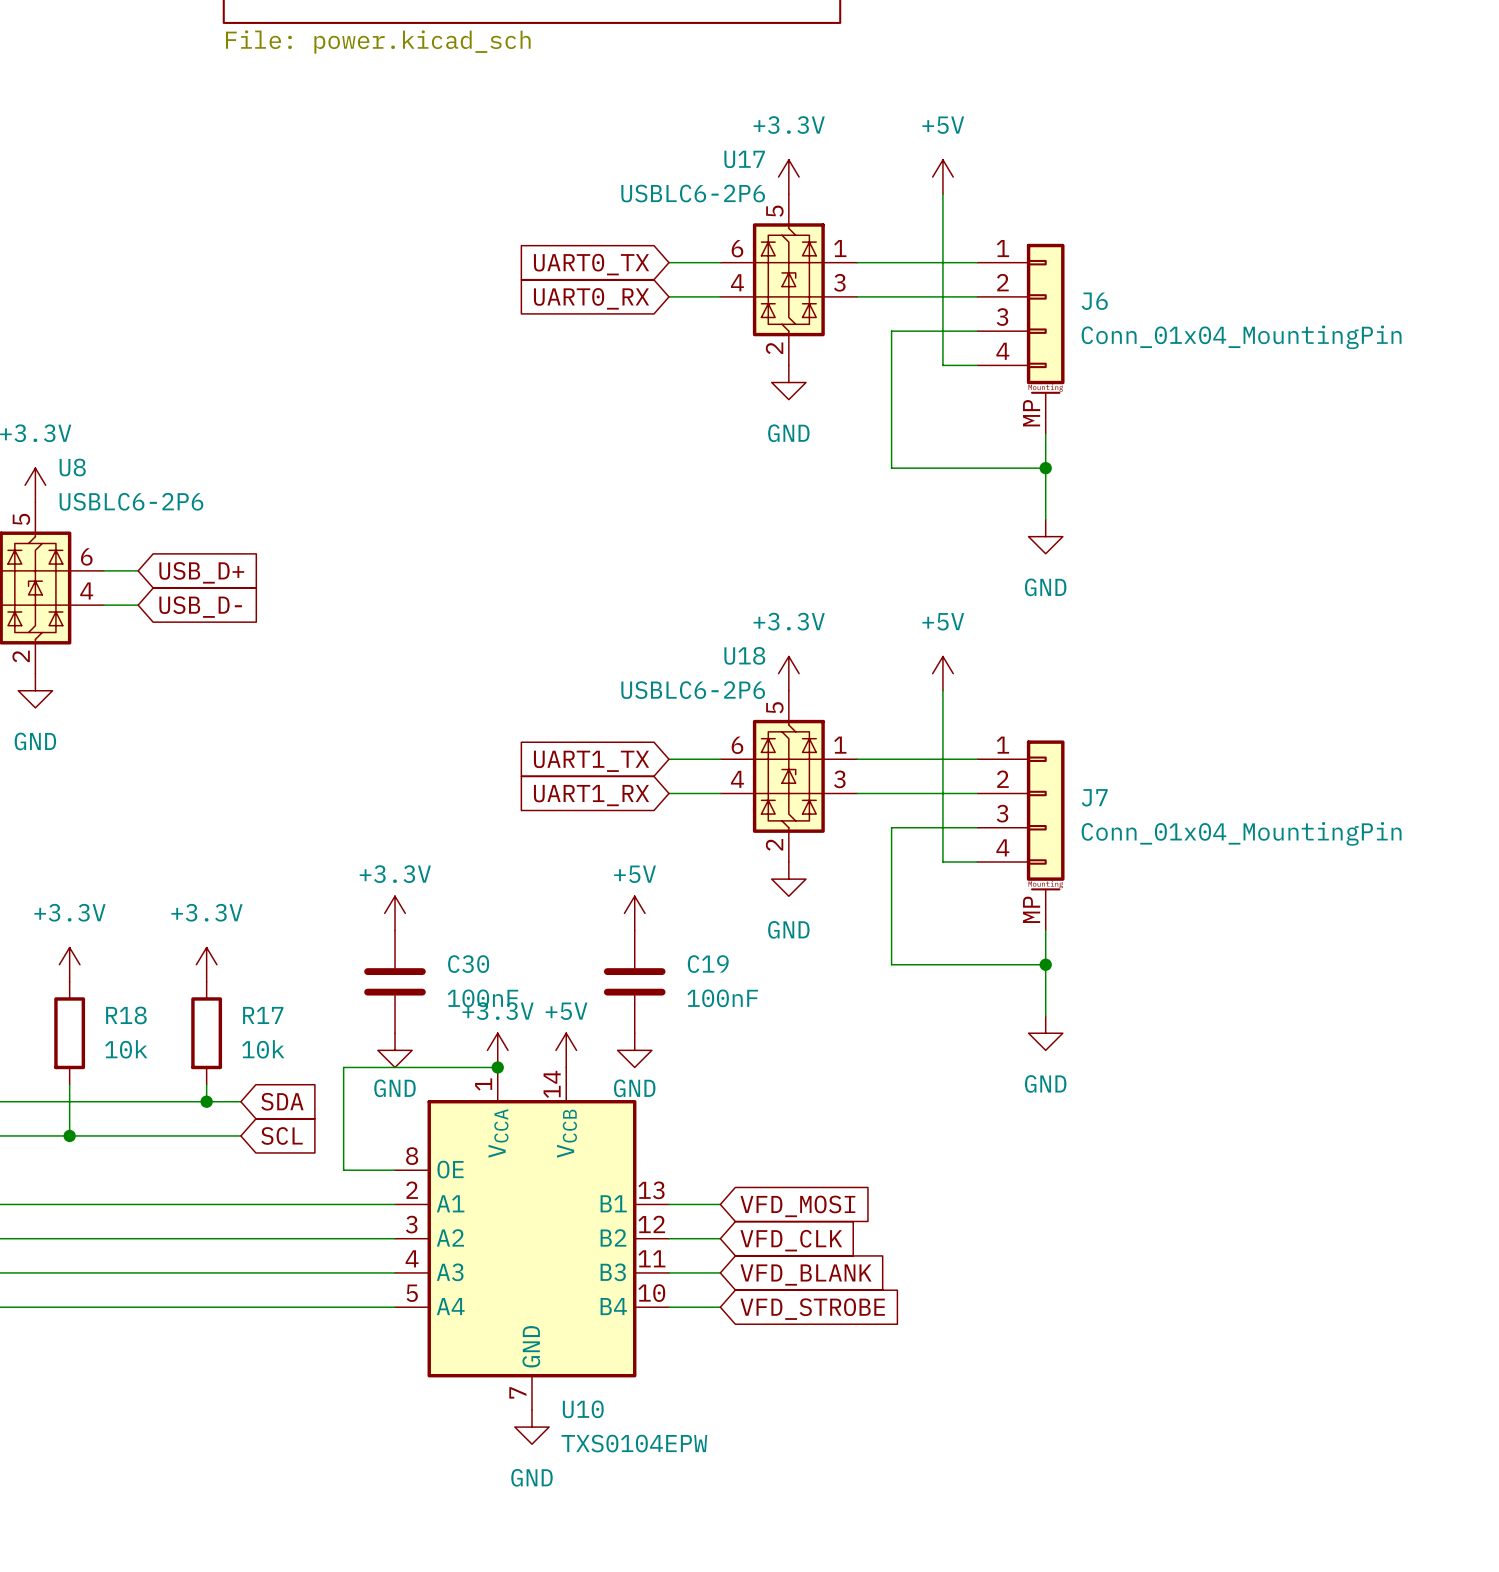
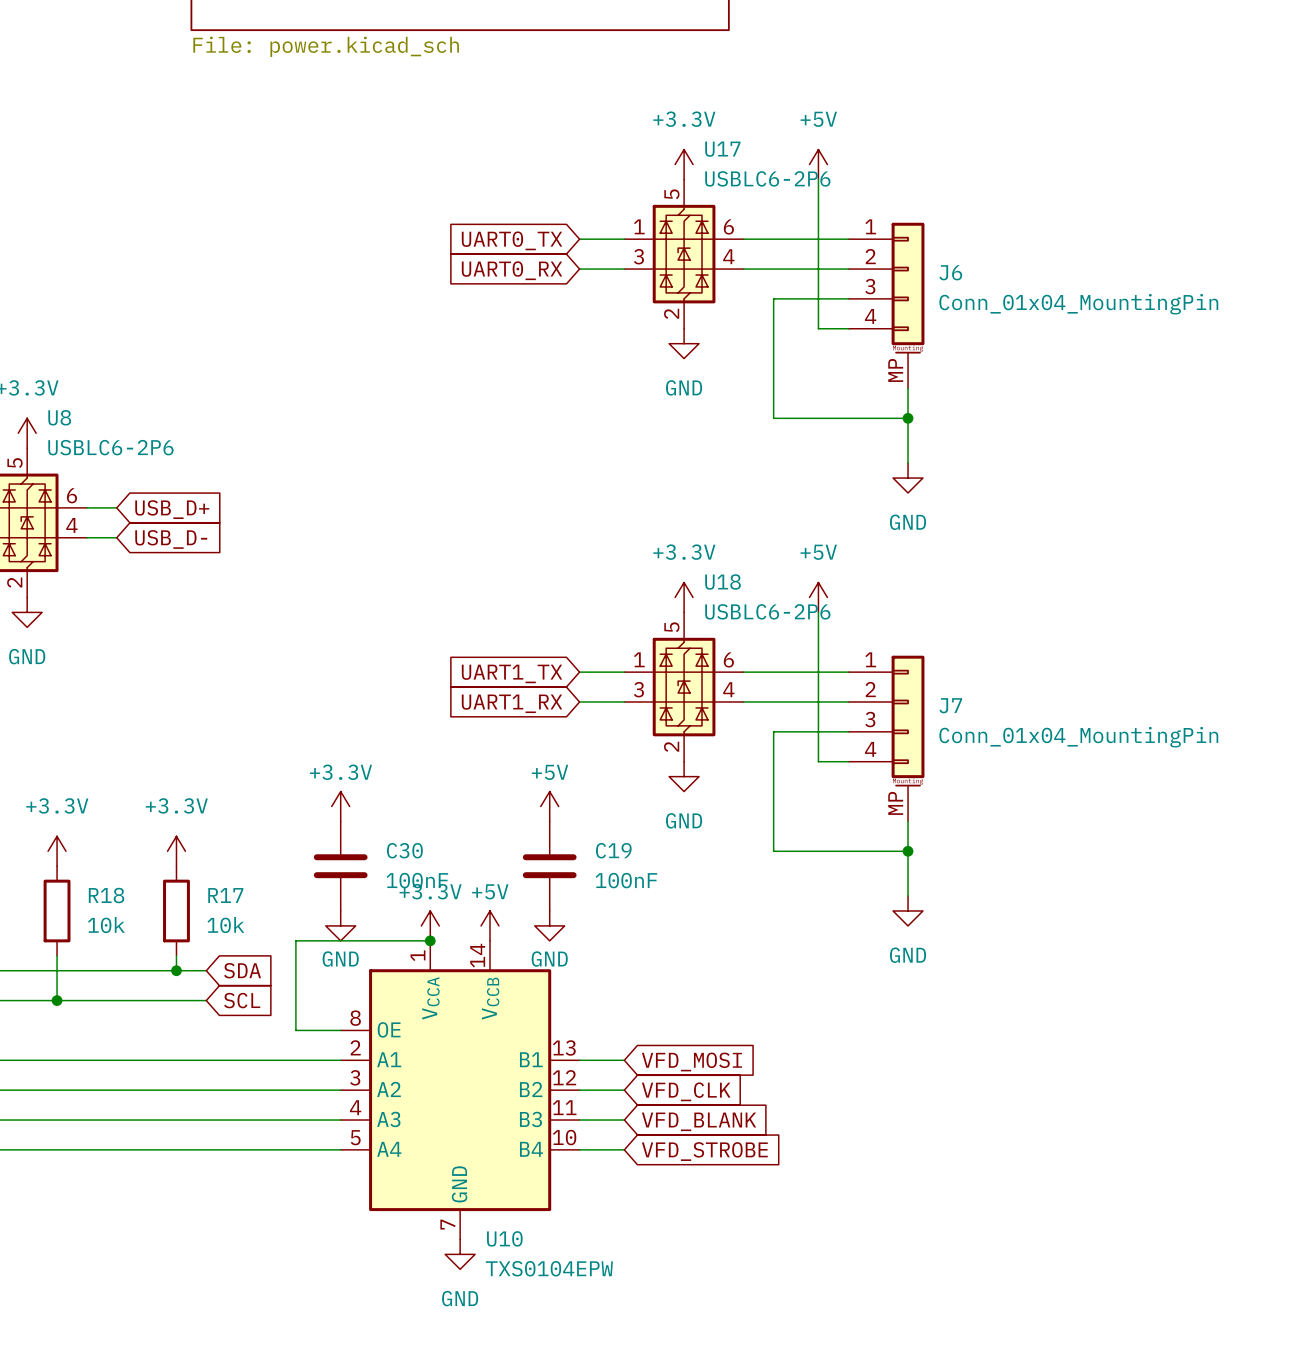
U17 flip: as is (788, 279) -> left-right (684, 254)
U18 flip: as is (788, 776) -> left-right (684, 687)

